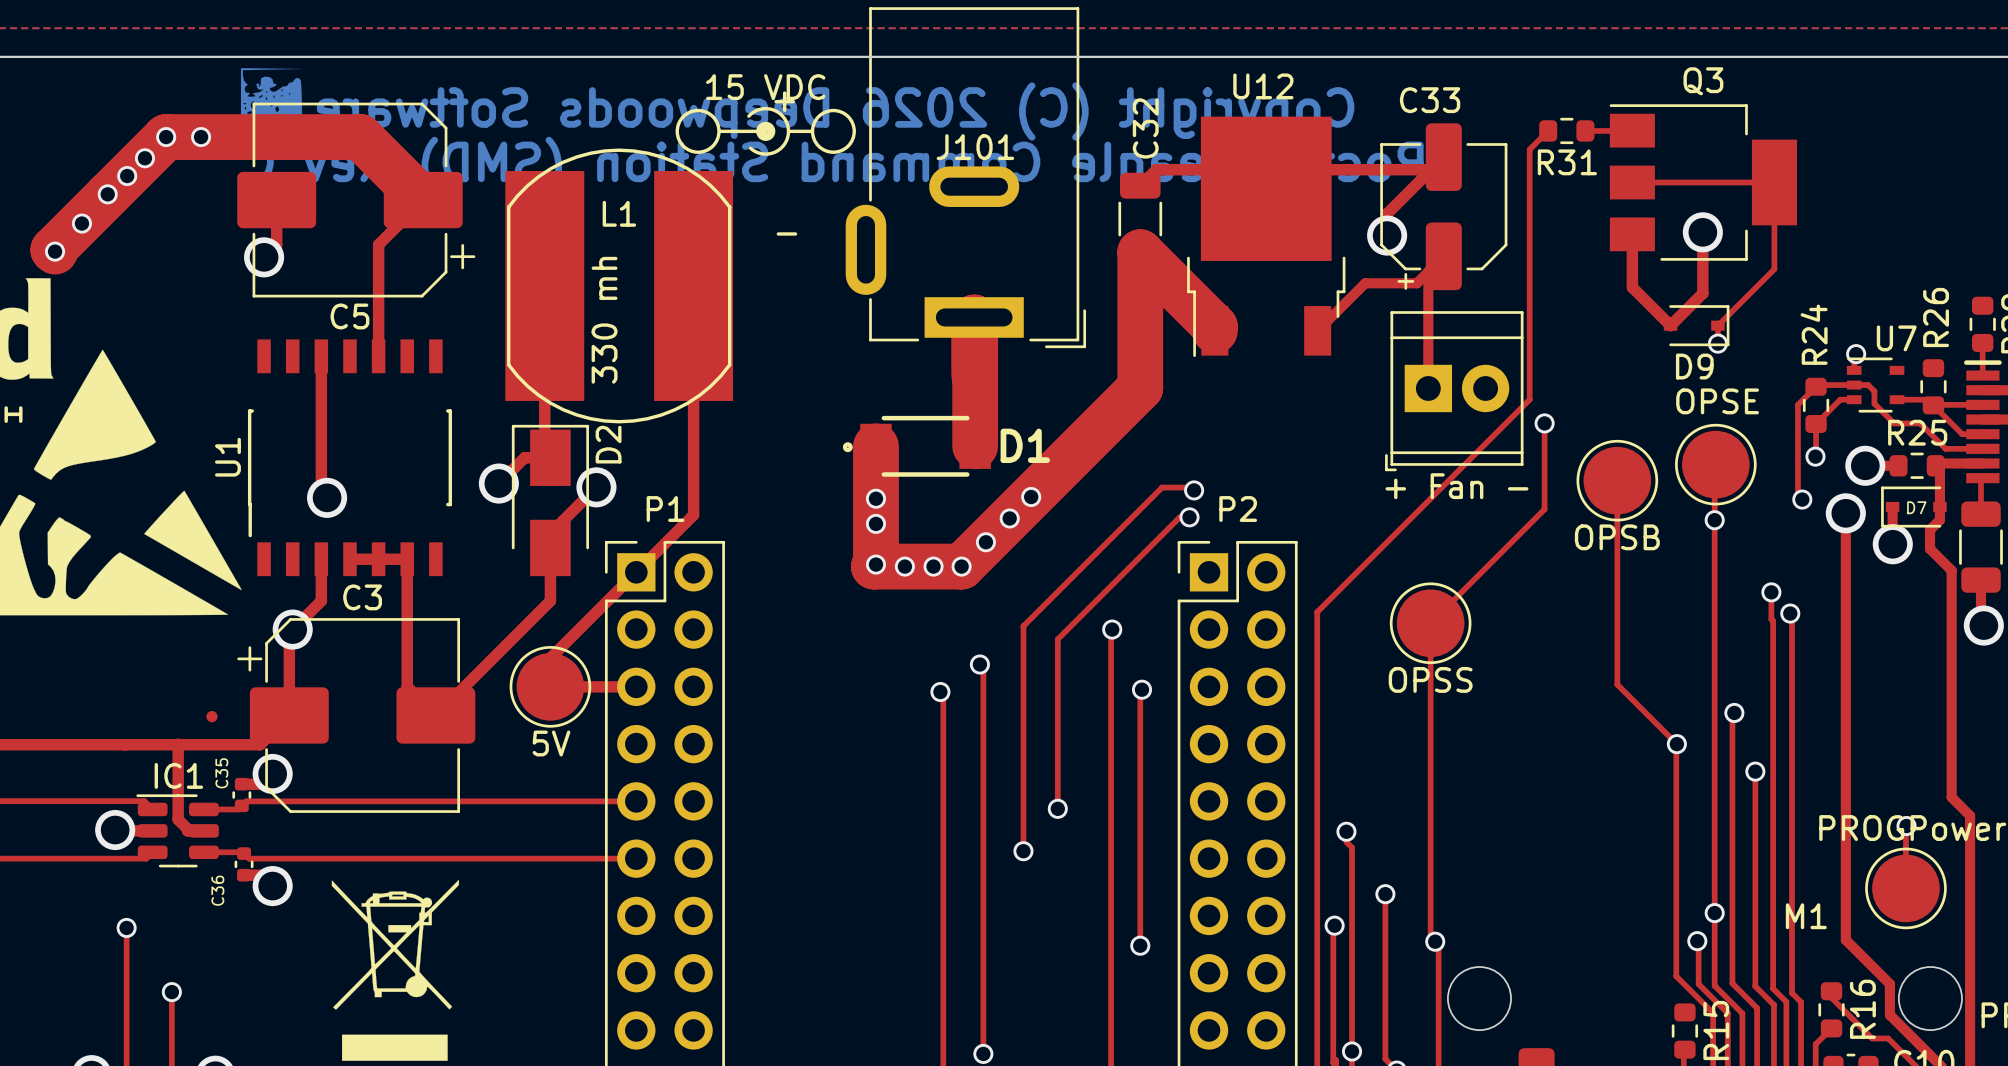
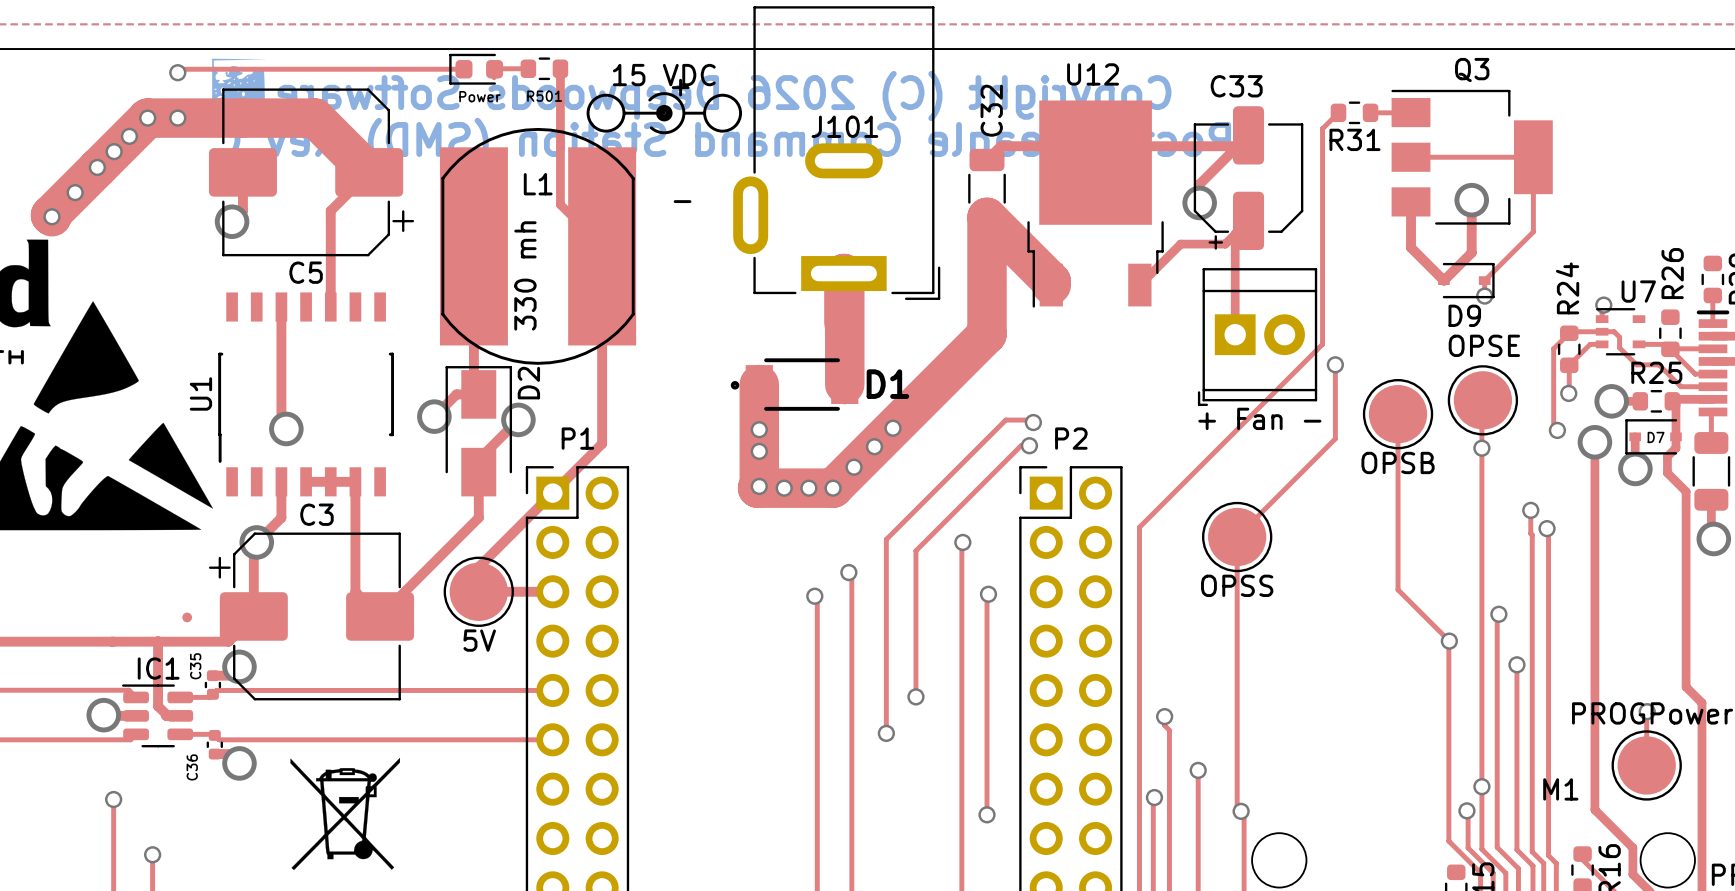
top track: none -> (528, 68) (494, 69)
R501: none -> (544, 68)
top track: none -> (560, 68) (560, 204) (602, 246)
top track: none -> (463, 69) (181, 69) (177, 72)
part: none -> Power (476, 69)
via: none -> (177, 72)

